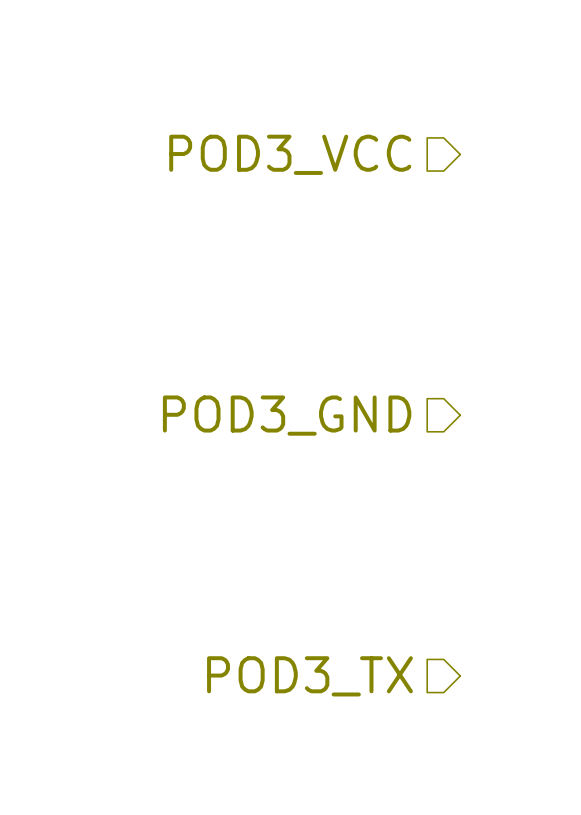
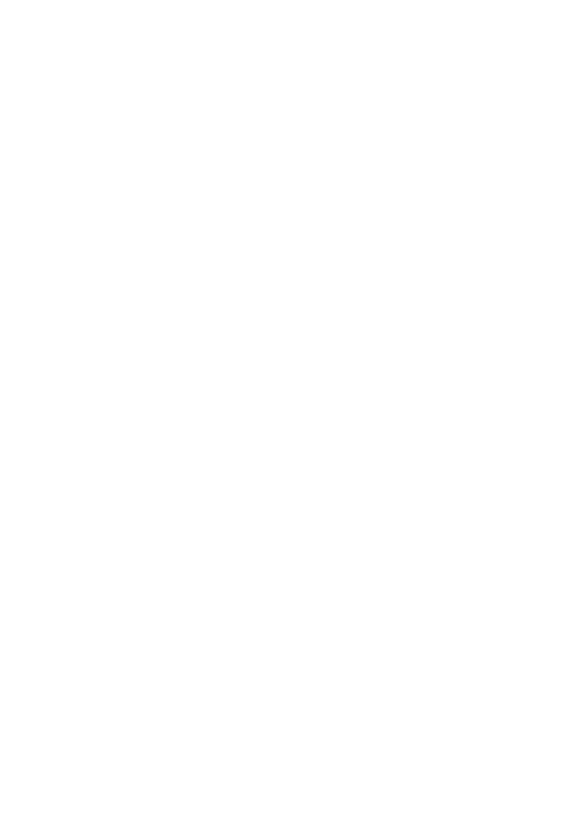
hierarchical label: POD3_VCC (290, 154) -> none
hierarchical label: POD3_GND (287, 415) -> none
hierarchical label: POD3_TX (309, 676) -> none

